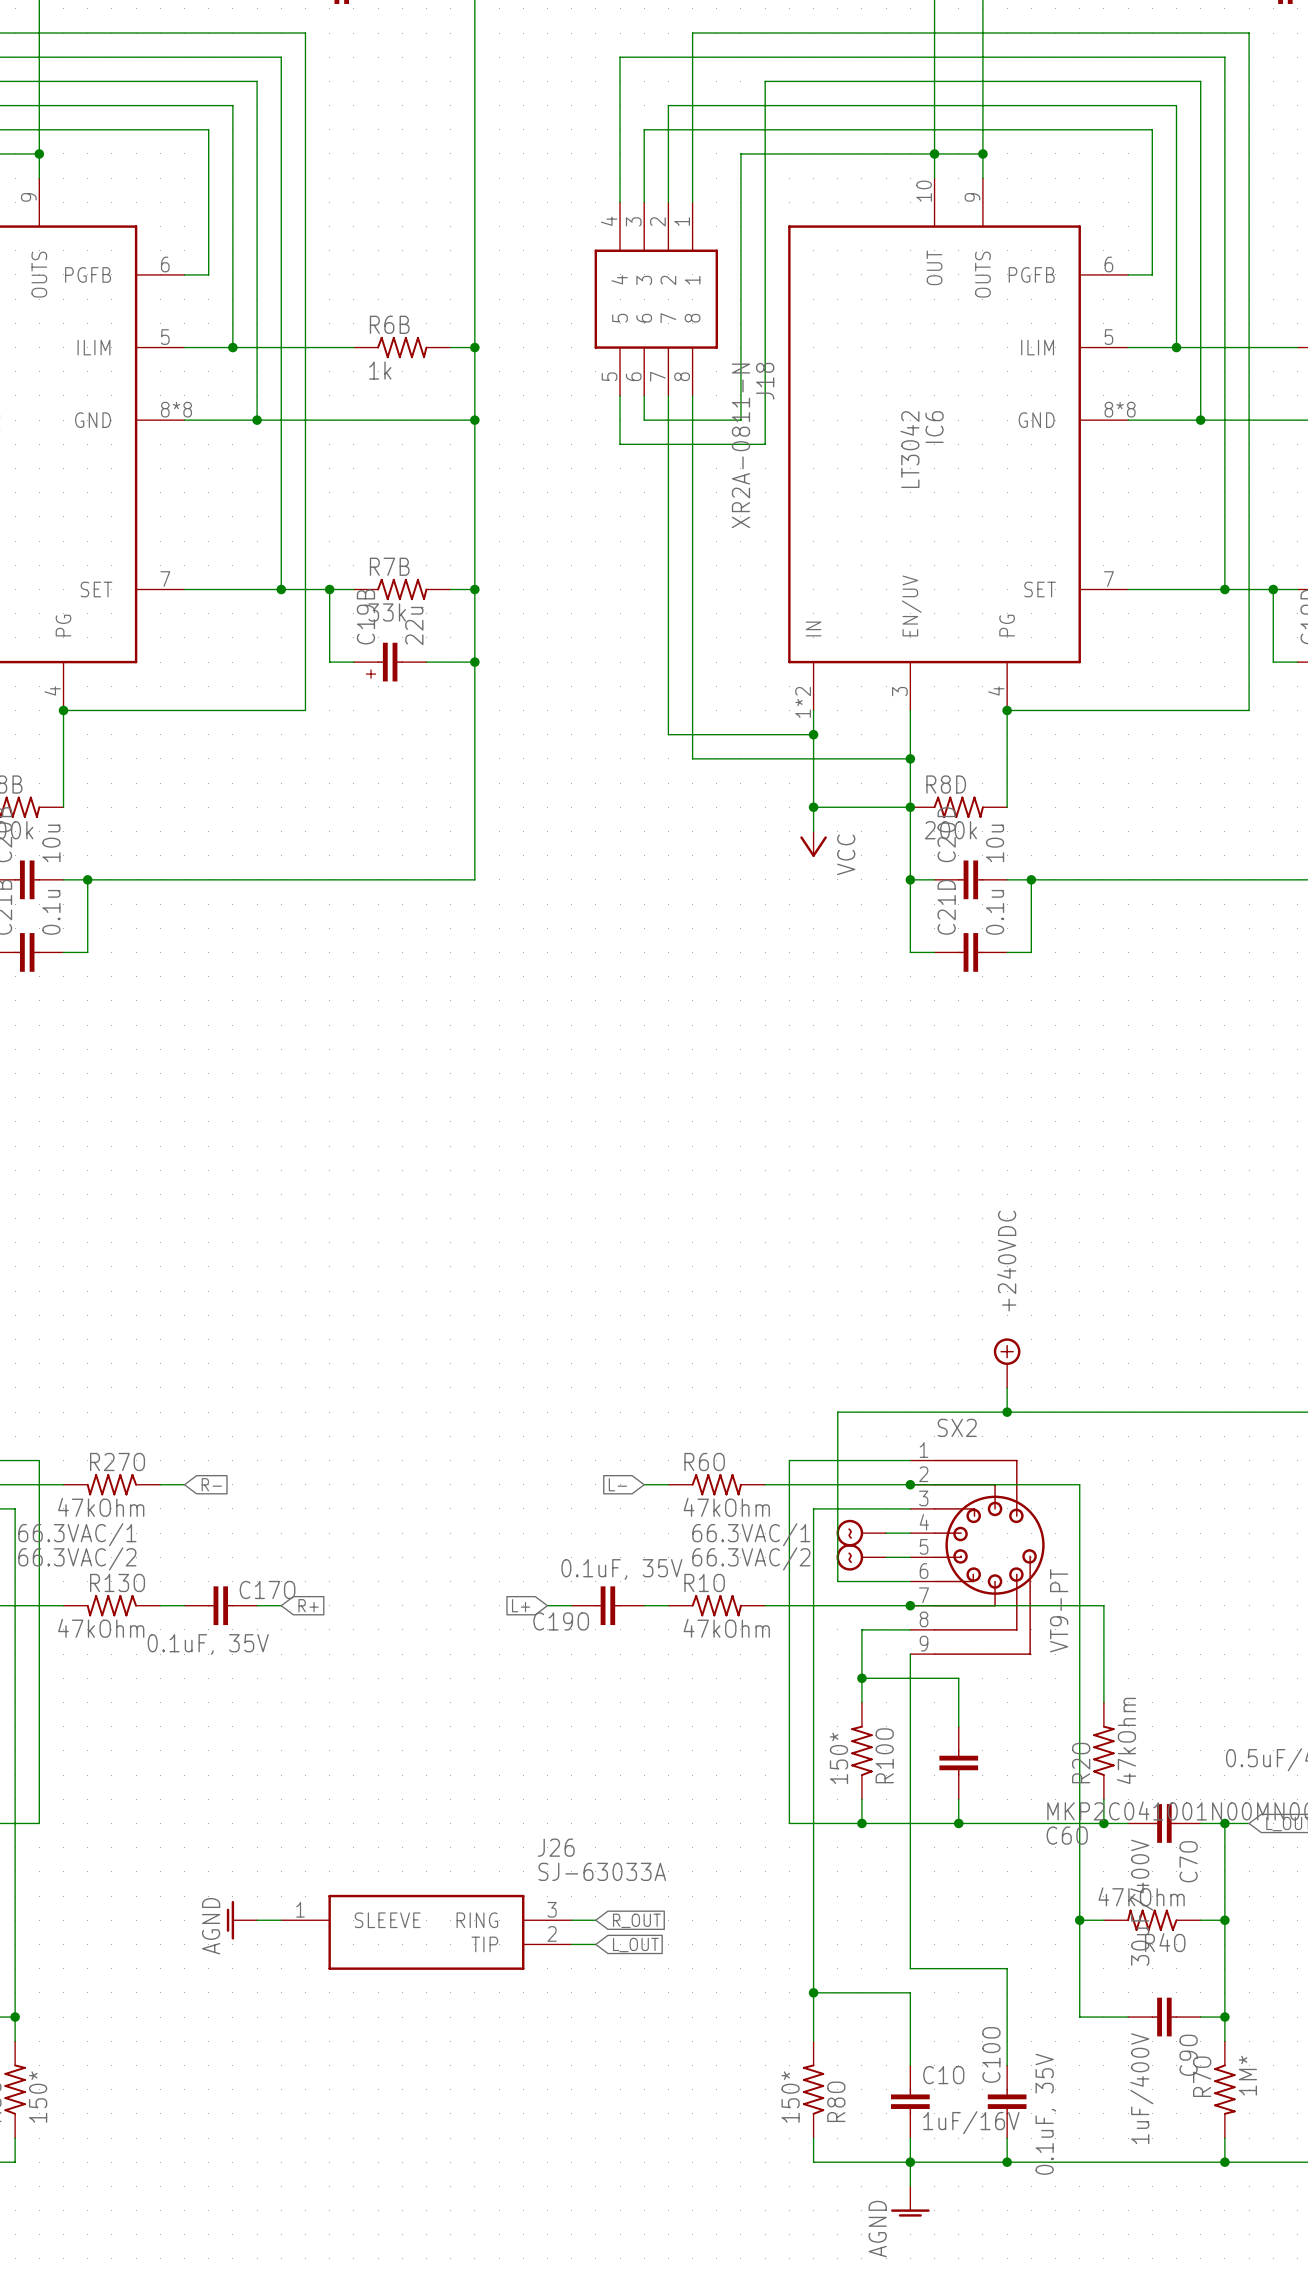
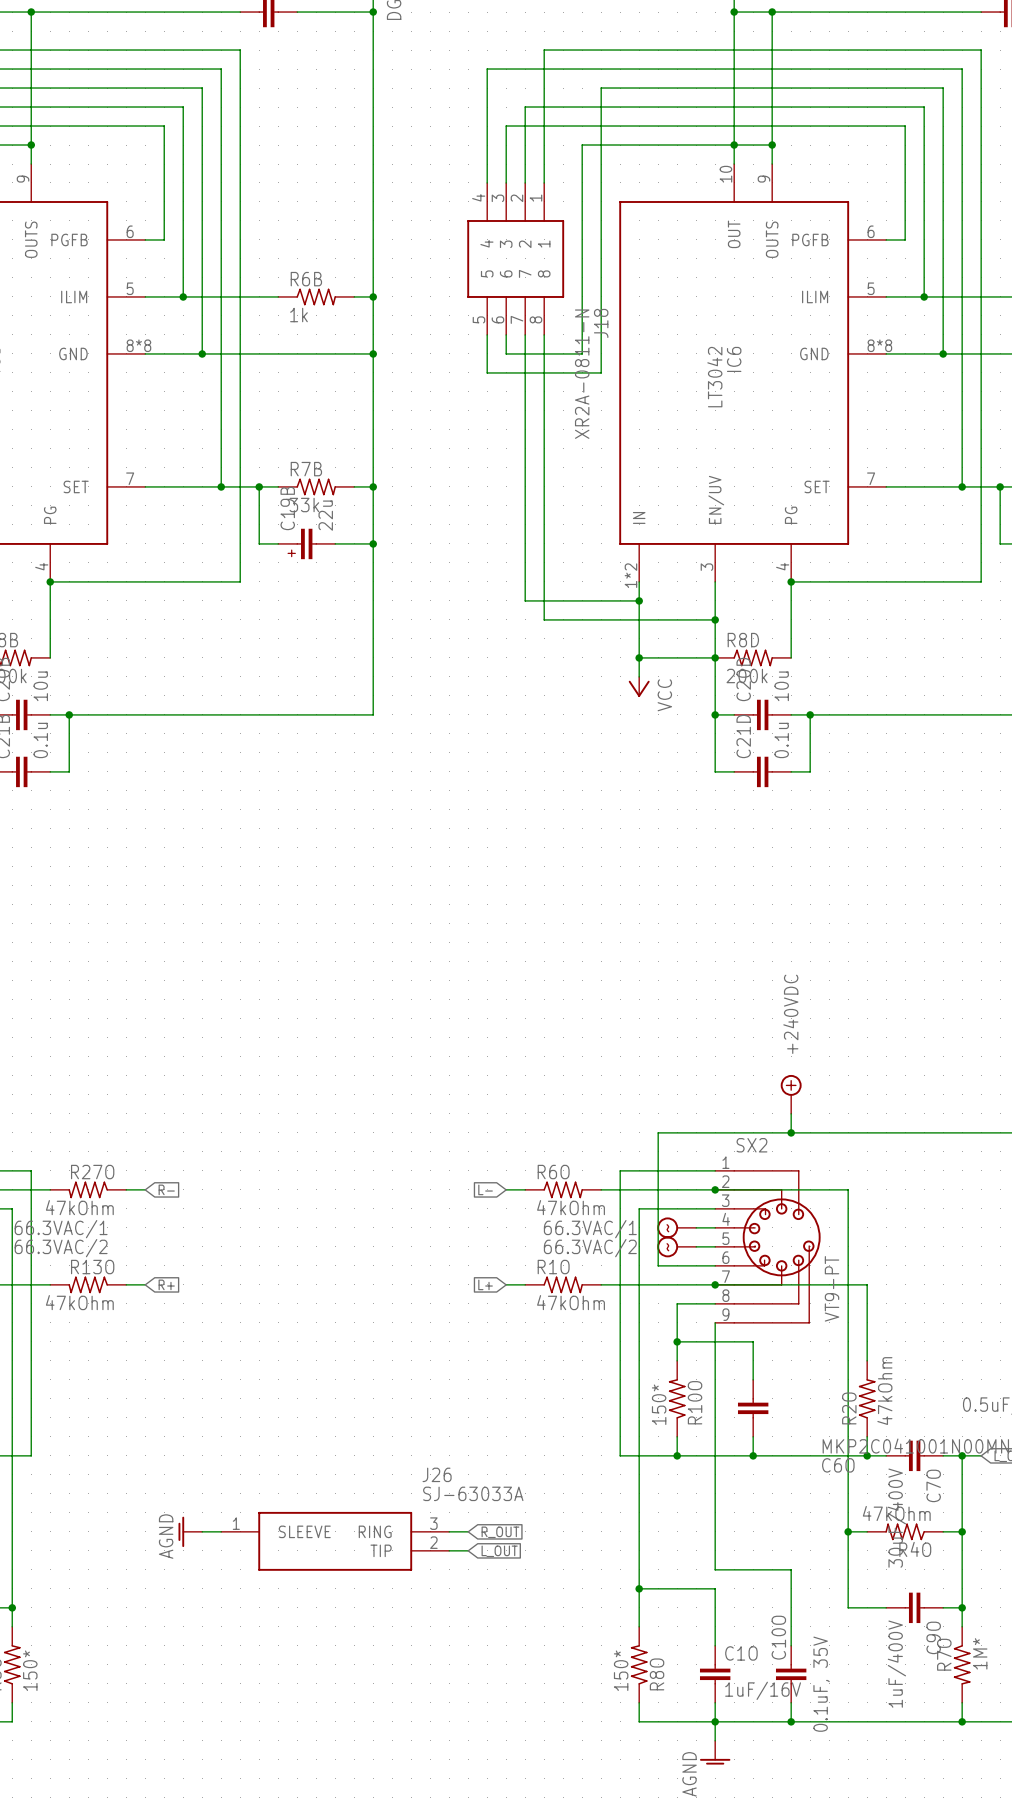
C17O: 0.1uF, 35V (220, 1605) -> none
wire: (257, 1605) (281, 1605) -> none
global label position: R+ (308, 1605) -> R+ (166, 1284)
global label position: L+ (521, 1605) -> L+ (485, 1284)
wire: (547, 1605) (571, 1605) -> none
C19O: 0.1uF, 35V (607, 1605) -> none

